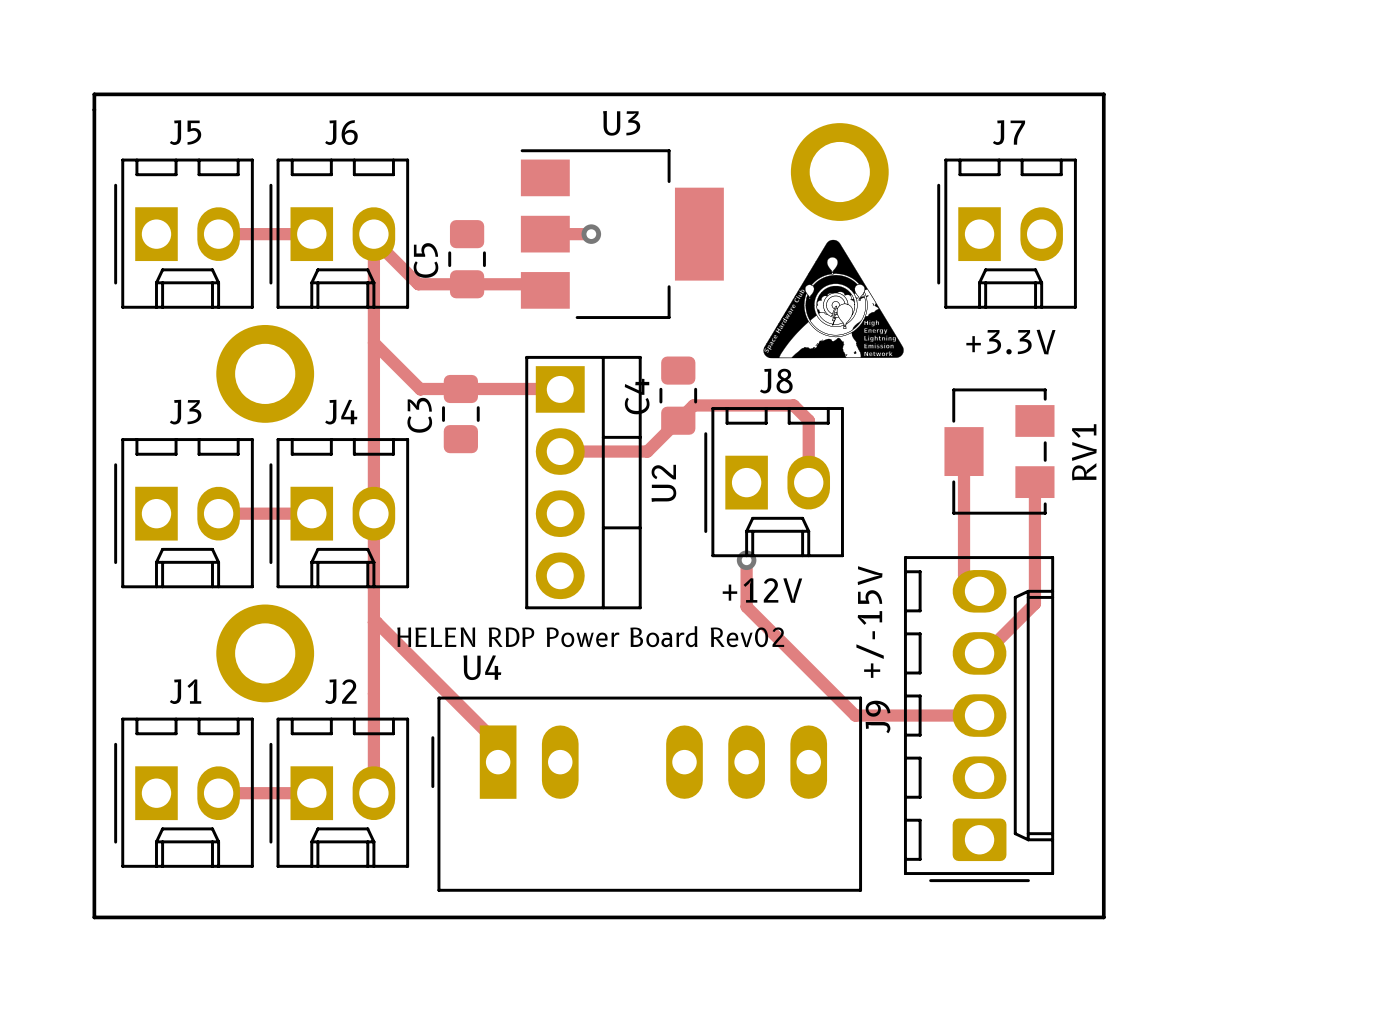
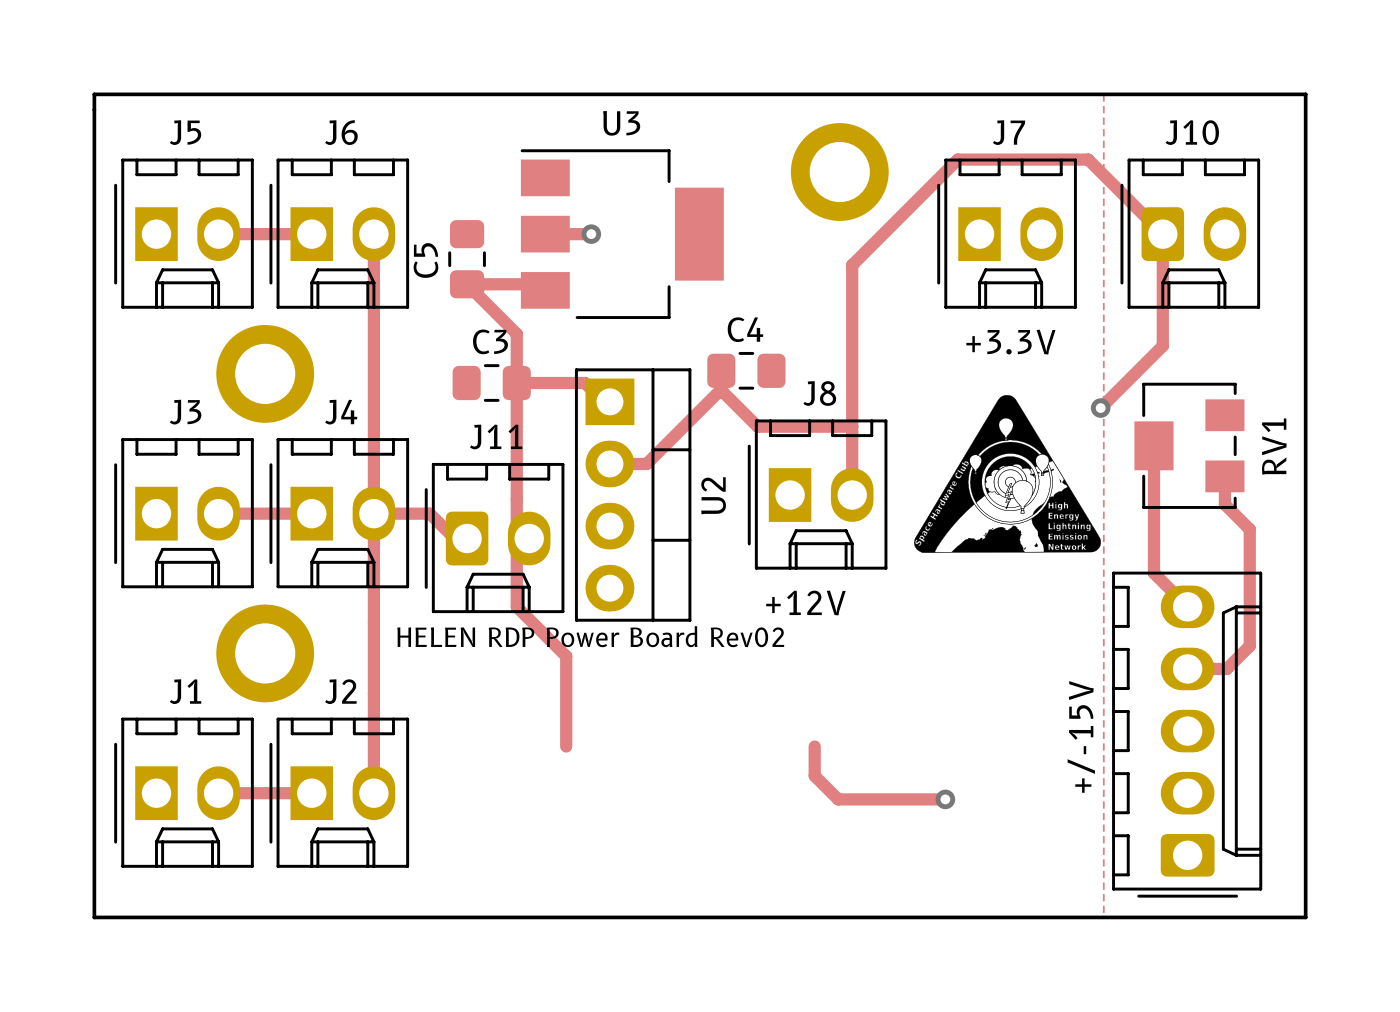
board edge: (1103, 94) (1103, 917) -> (1103, 94) (1305, 94) (1305, 917) (1103, 917)
J10: none -> (1190, 233)
track: (373, 239) (418, 284) (467, 284) -> (566, 746) (566, 656) (516, 606) (516, 333) (467, 284)
drawing: [763, 239, 904, 359] -> none
track: (373, 342) (420, 389) (560, 389) -> none
track: none -> (721, 370) (721, 390) (757, 426) (852, 426)
track: none -> (516, 383) (584, 383) (603, 401)
track: none -> (721, 389) (646, 463) (609, 463)
C4 rotation: 0° (678, 395) -> 90° clockwise (746, 370)
C4 position: (678, 395) -> (746, 370)
drawing: none -> [914, 395, 1101, 553]
track: none -> (1100, 408) (1162, 345) (1162, 234) (1088, 159) (957, 159) (852, 265) (852, 495)
via: none -> (1100, 408)
C3 rotation: 0° (460, 414) -> 90° clockwise (491, 383)
track: none -> (1153, 445) (1153, 573) (1187, 606)
track: (560, 451) (647, 451) (693, 405) (793, 405) (808, 420) (808, 482) -> none
track: (964, 451) (964, 575) (979, 591) -> none
RV1 position: (999, 451) -> (1189, 445)
track: none -> (1224, 476) (1224, 504) (1249, 529) (1249, 645) (1226, 668) (1187, 668)
U2 position: (583, 482) -> (633, 495)
J8 position: (774, 482) -> (817, 494)
track: (1034, 482) (1034, 603) (985, 653) (979, 653) -> none
track: none -> (373, 513) (429, 513) (454, 538)
J11: none -> (494, 538)
track: (746, 560) (746, 606) (855, 715) (979, 715) -> none
via: (746, 560) -> none
text position: +12V (762, 590) -> +12V (805, 602)
track: (373, 622) (376, 622) (498, 743) (498, 762) -> none
text position: +/-15V (870, 622) -> +/-15V (1081, 736)
J9: (979, 719) -> none
part: none -> (1187, 734)
track: none -> (814, 746) (814, 775) (838, 799) (945, 799)
U4: (646, 794) -> none
via: none -> (945, 799)

